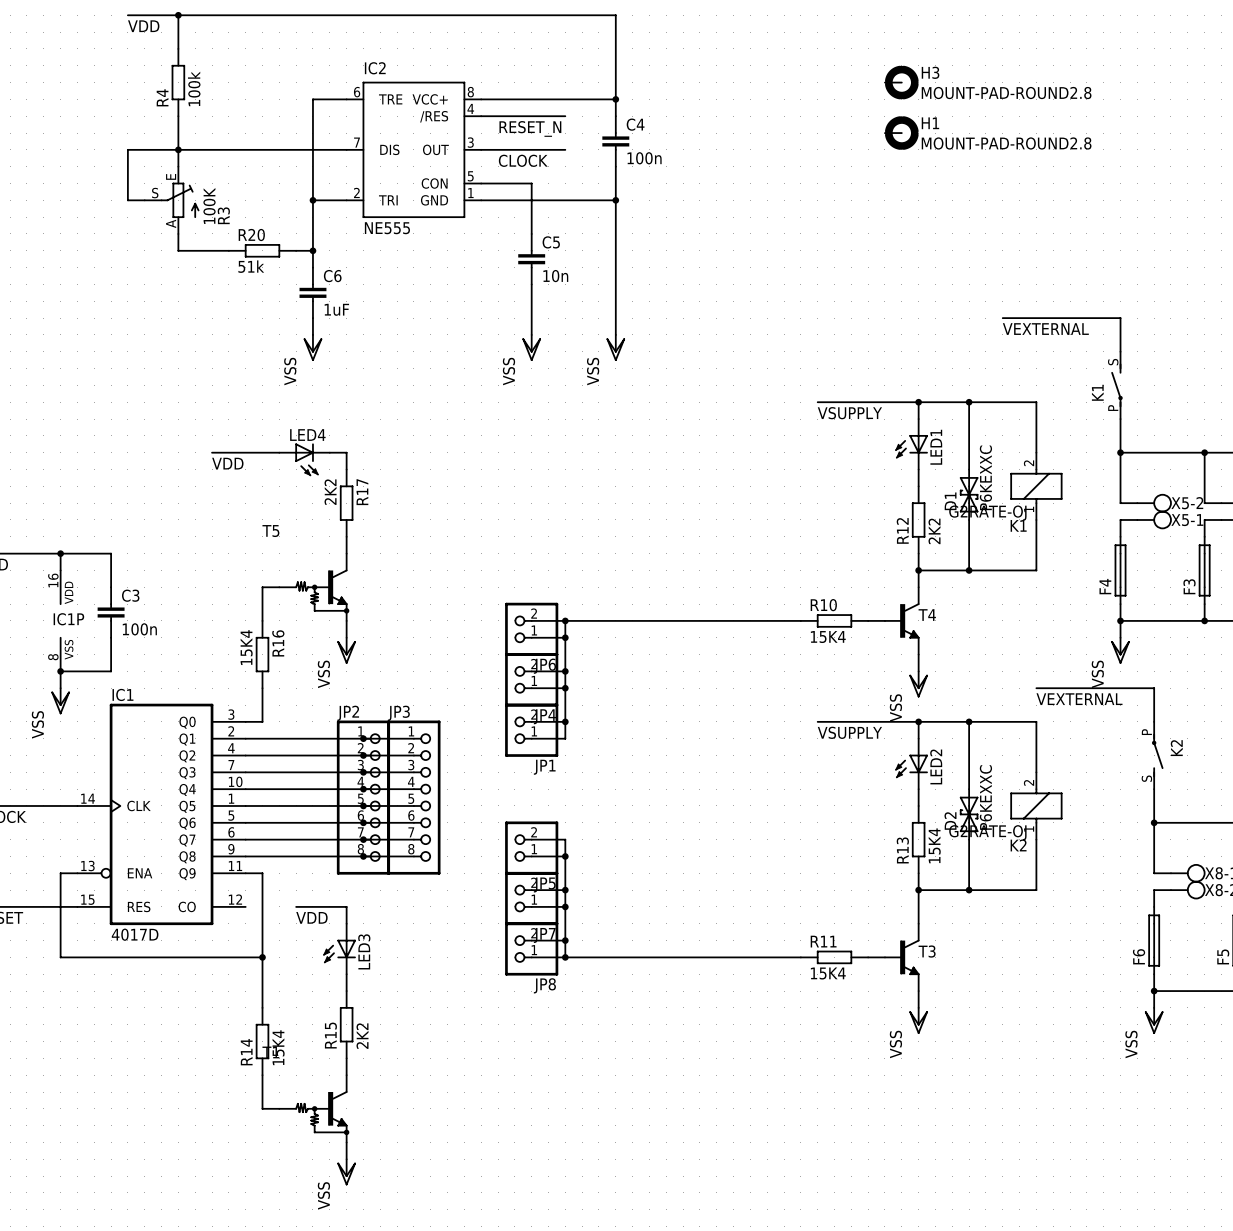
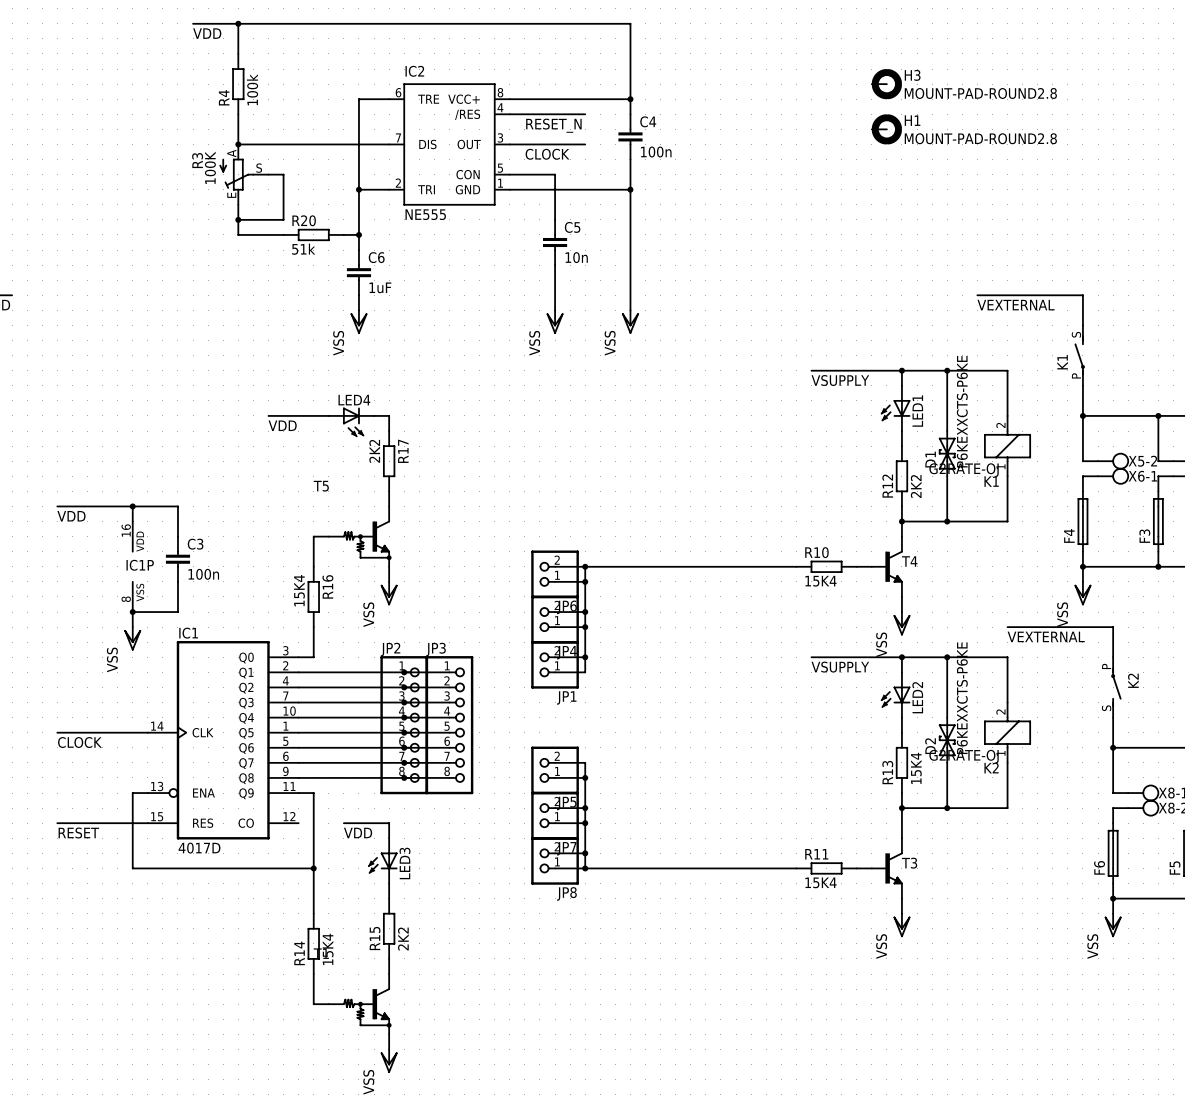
wire: (178, 166) (178, 149) (127, 149) (127, 200) (144, 200) -> none
wire: none -> (268, 174) (283, 174) (283, 219) (238, 219) (238, 204)
R3 rotation: 0° (180, 200) -> 180° (236, 174)
junction: none -> (238, 219)
D1 value: P6KEXXC (985, 477) -> P6KEXXCTS-P6KE (962, 411)
X5-1 name: X5-1 (1187, 520) -> X6-1 (1142, 476)
D2 value: P6KEXXC (985, 797) -> P6KEXXCTS-P6KE (962, 698)

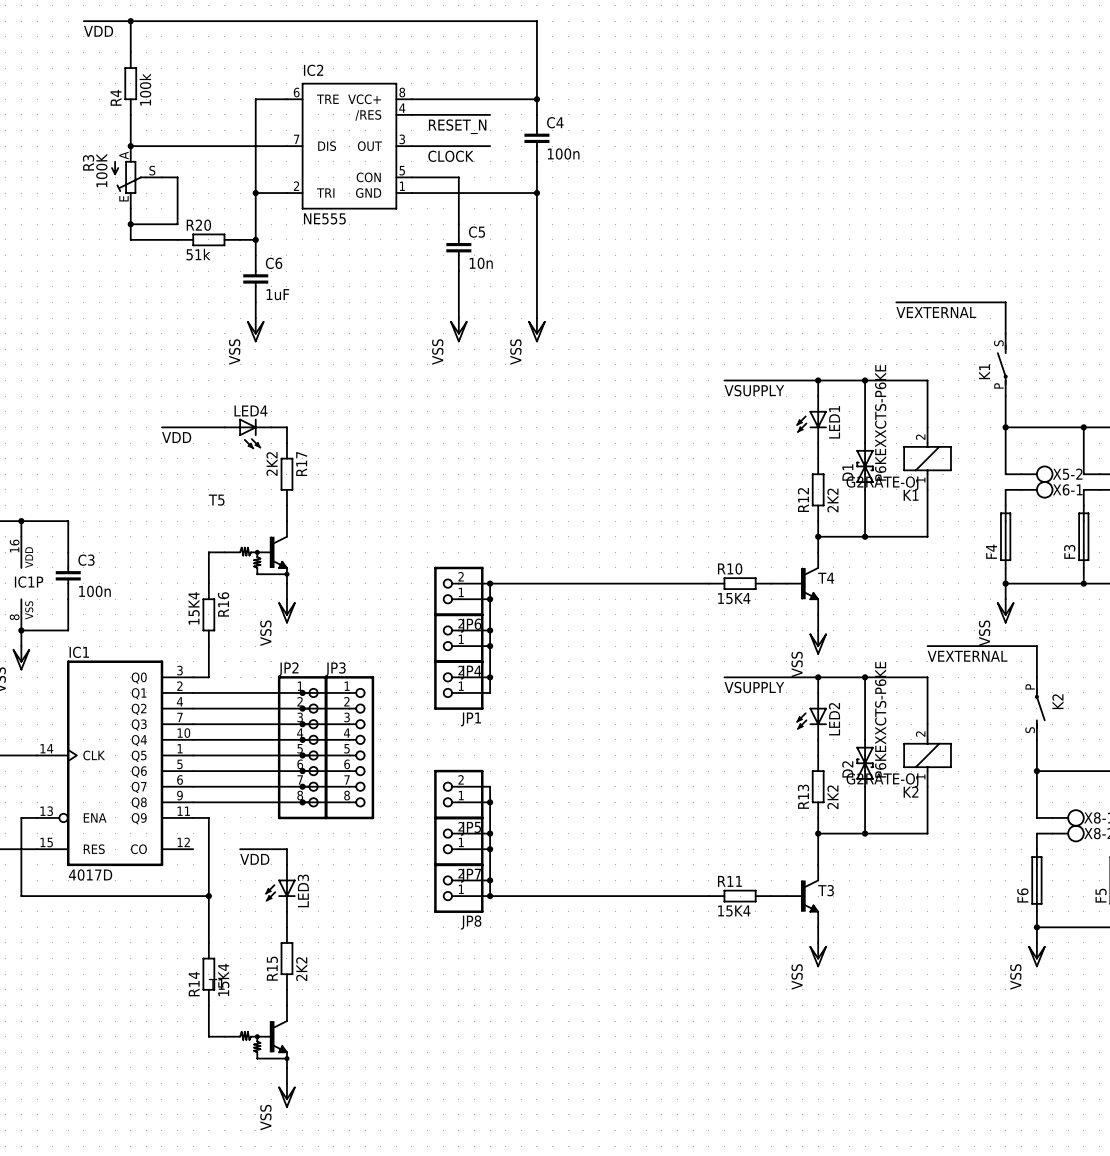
H3: MOUNT-PAD-ROUND2.8 (886, 84) -> none
H1: MOUNT-PAD-ROUND2.8 (886, 129) -> none
R13 value: 15K4 (916, 768) -> 2K2 (832, 797)

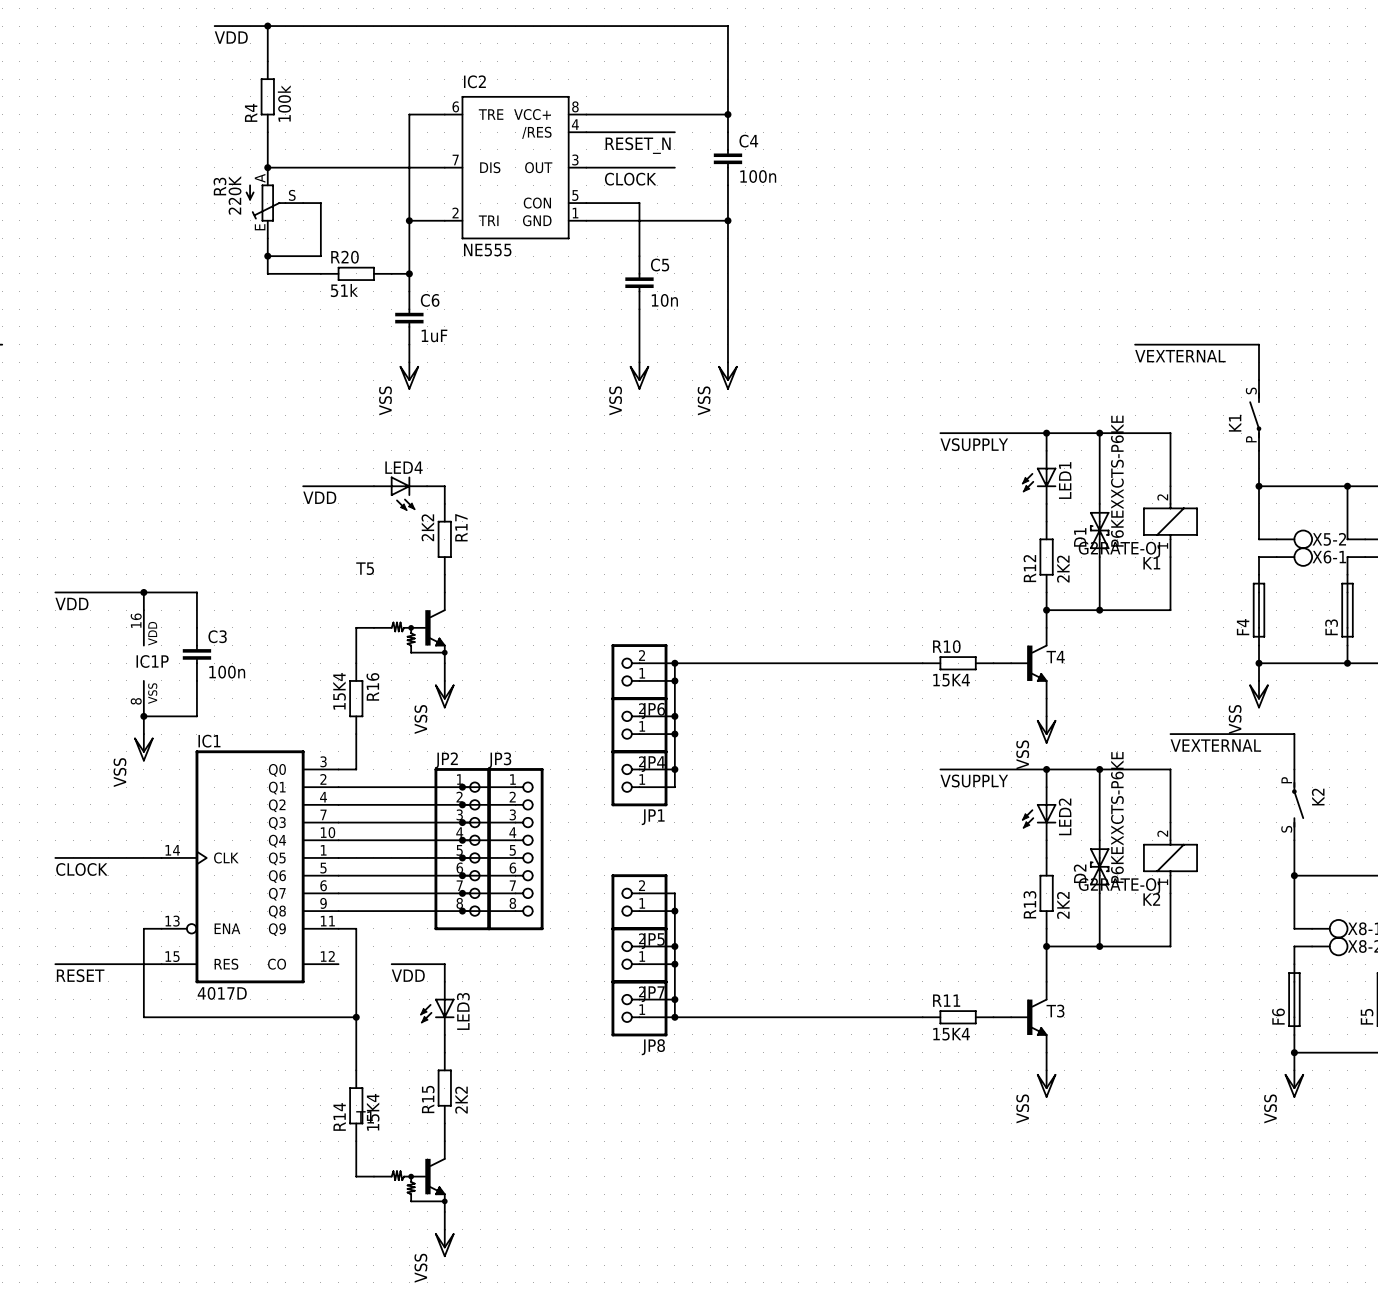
R3 value: 100K (101, 170) -> 220K (235, 195)

